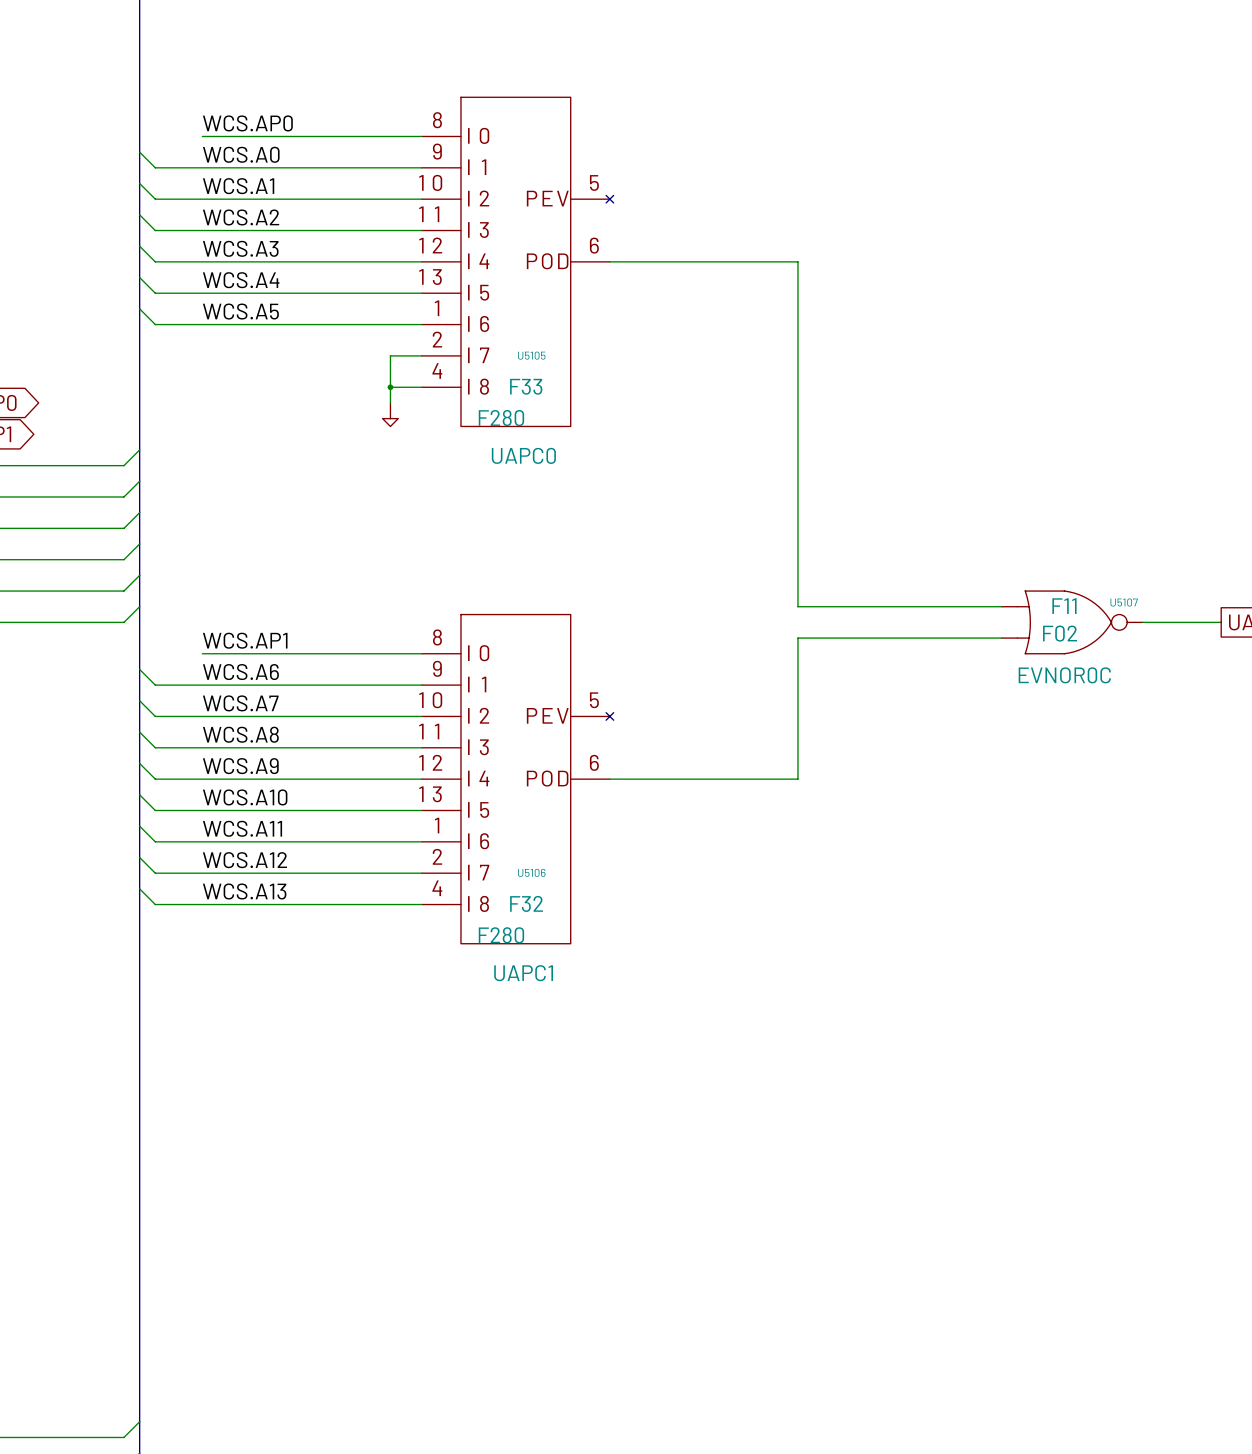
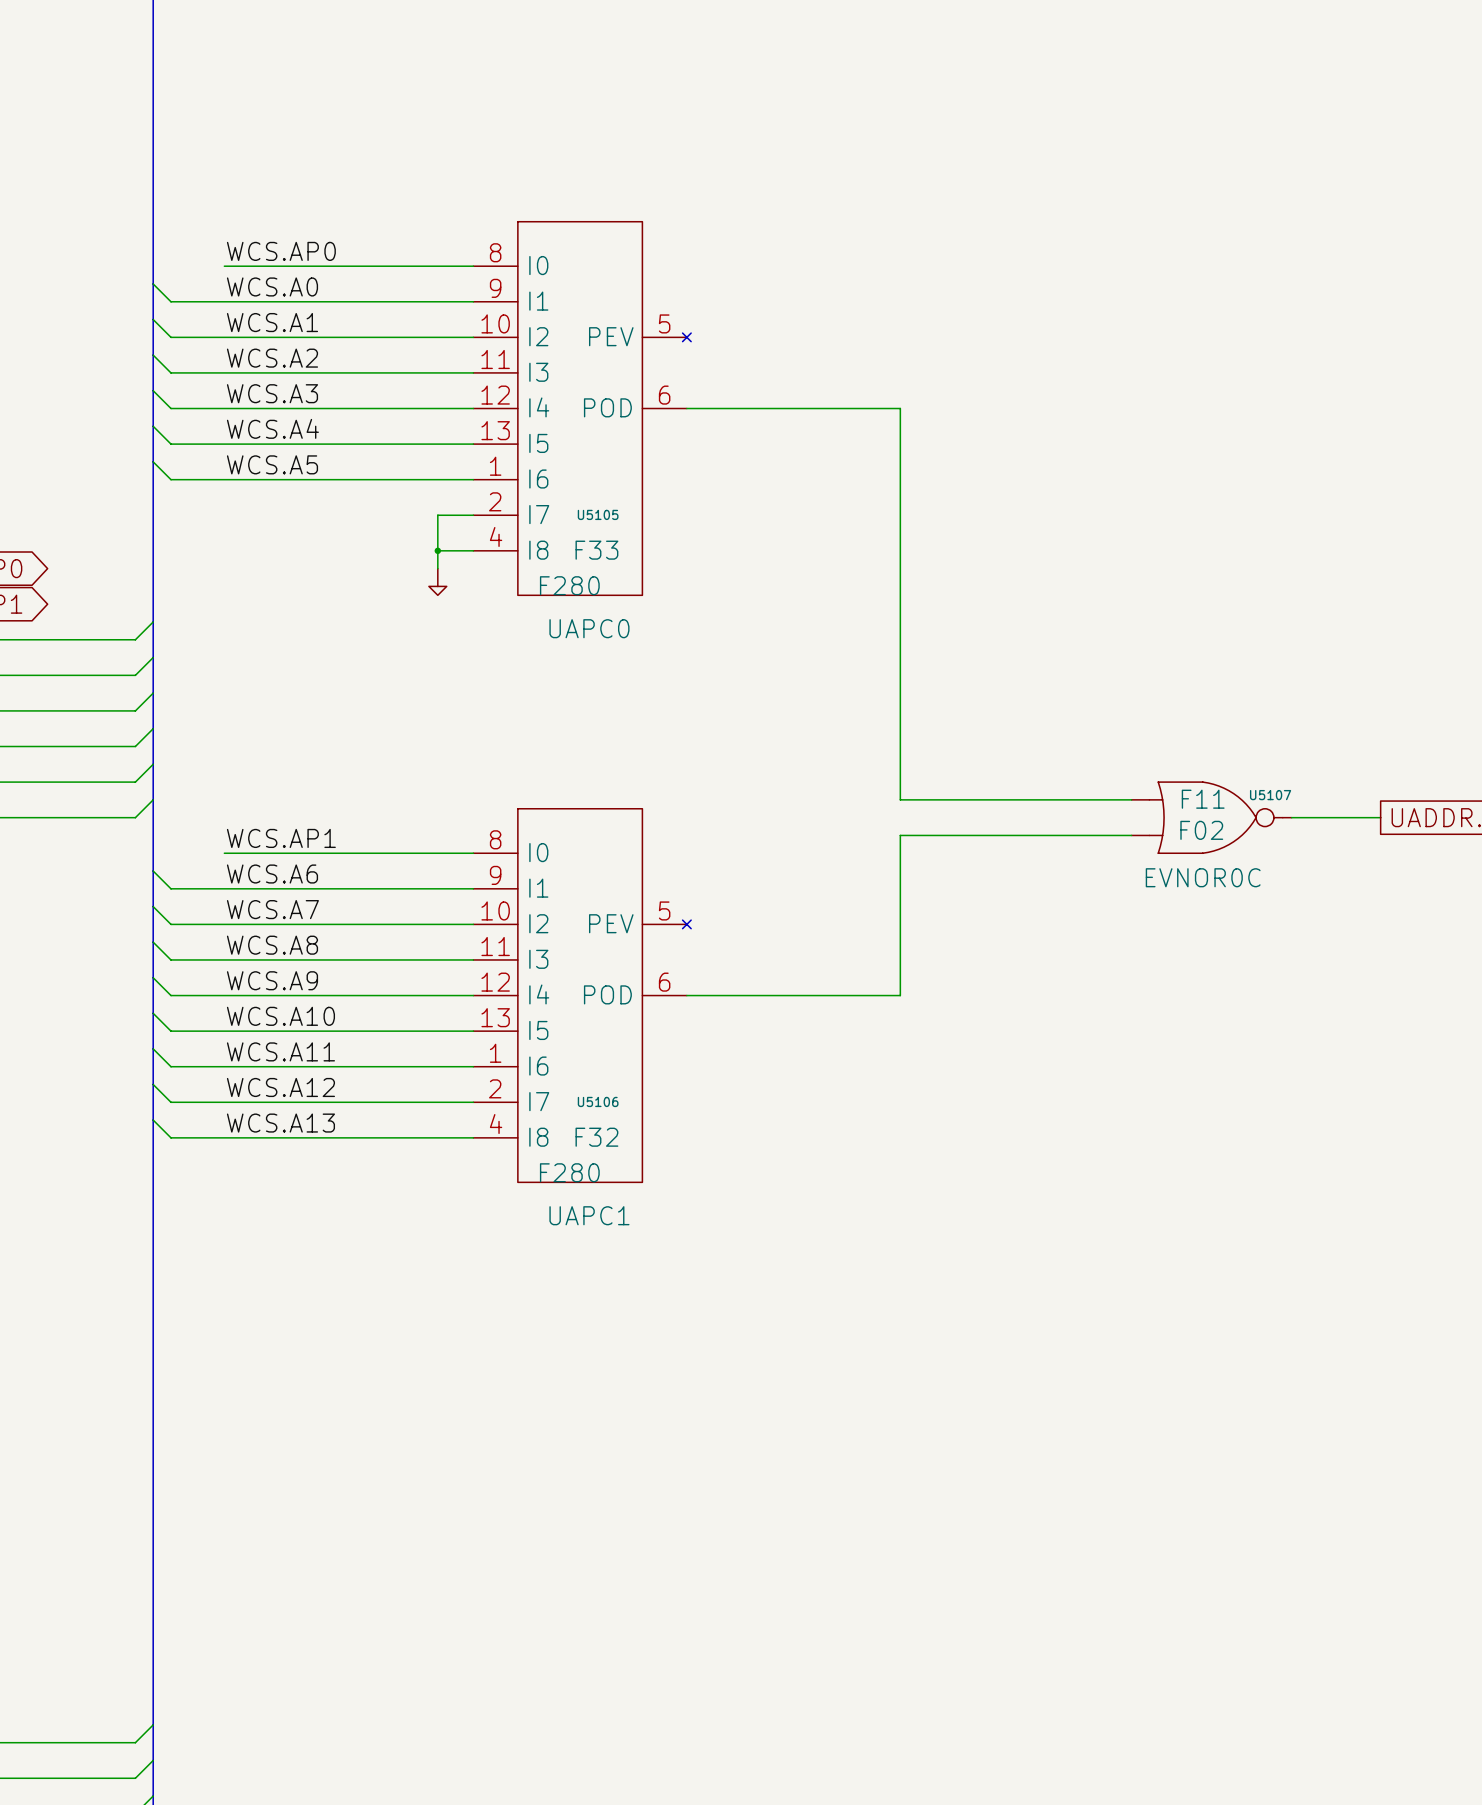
U5105 symbol: [421, 97, 610, 427] -> [473, 221, 687, 596]
U5106 symbol: [421, 614, 610, 944] -> [473, 808, 687, 1183]

